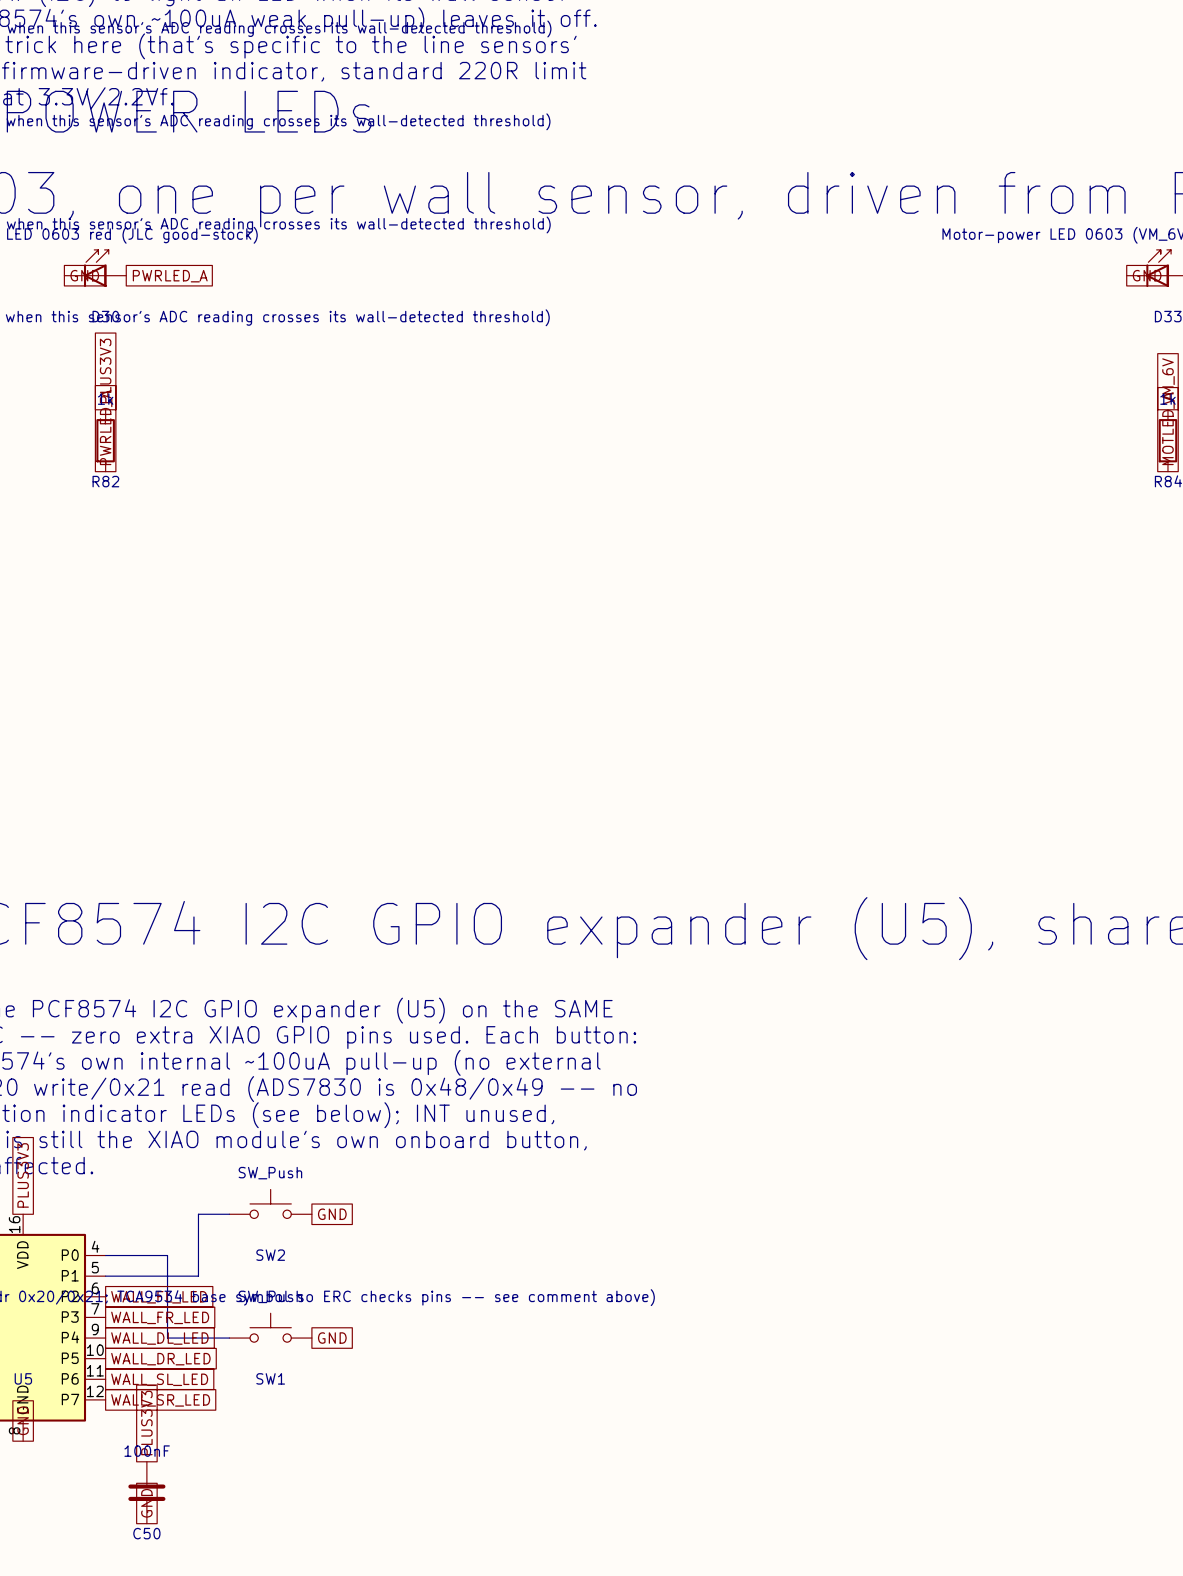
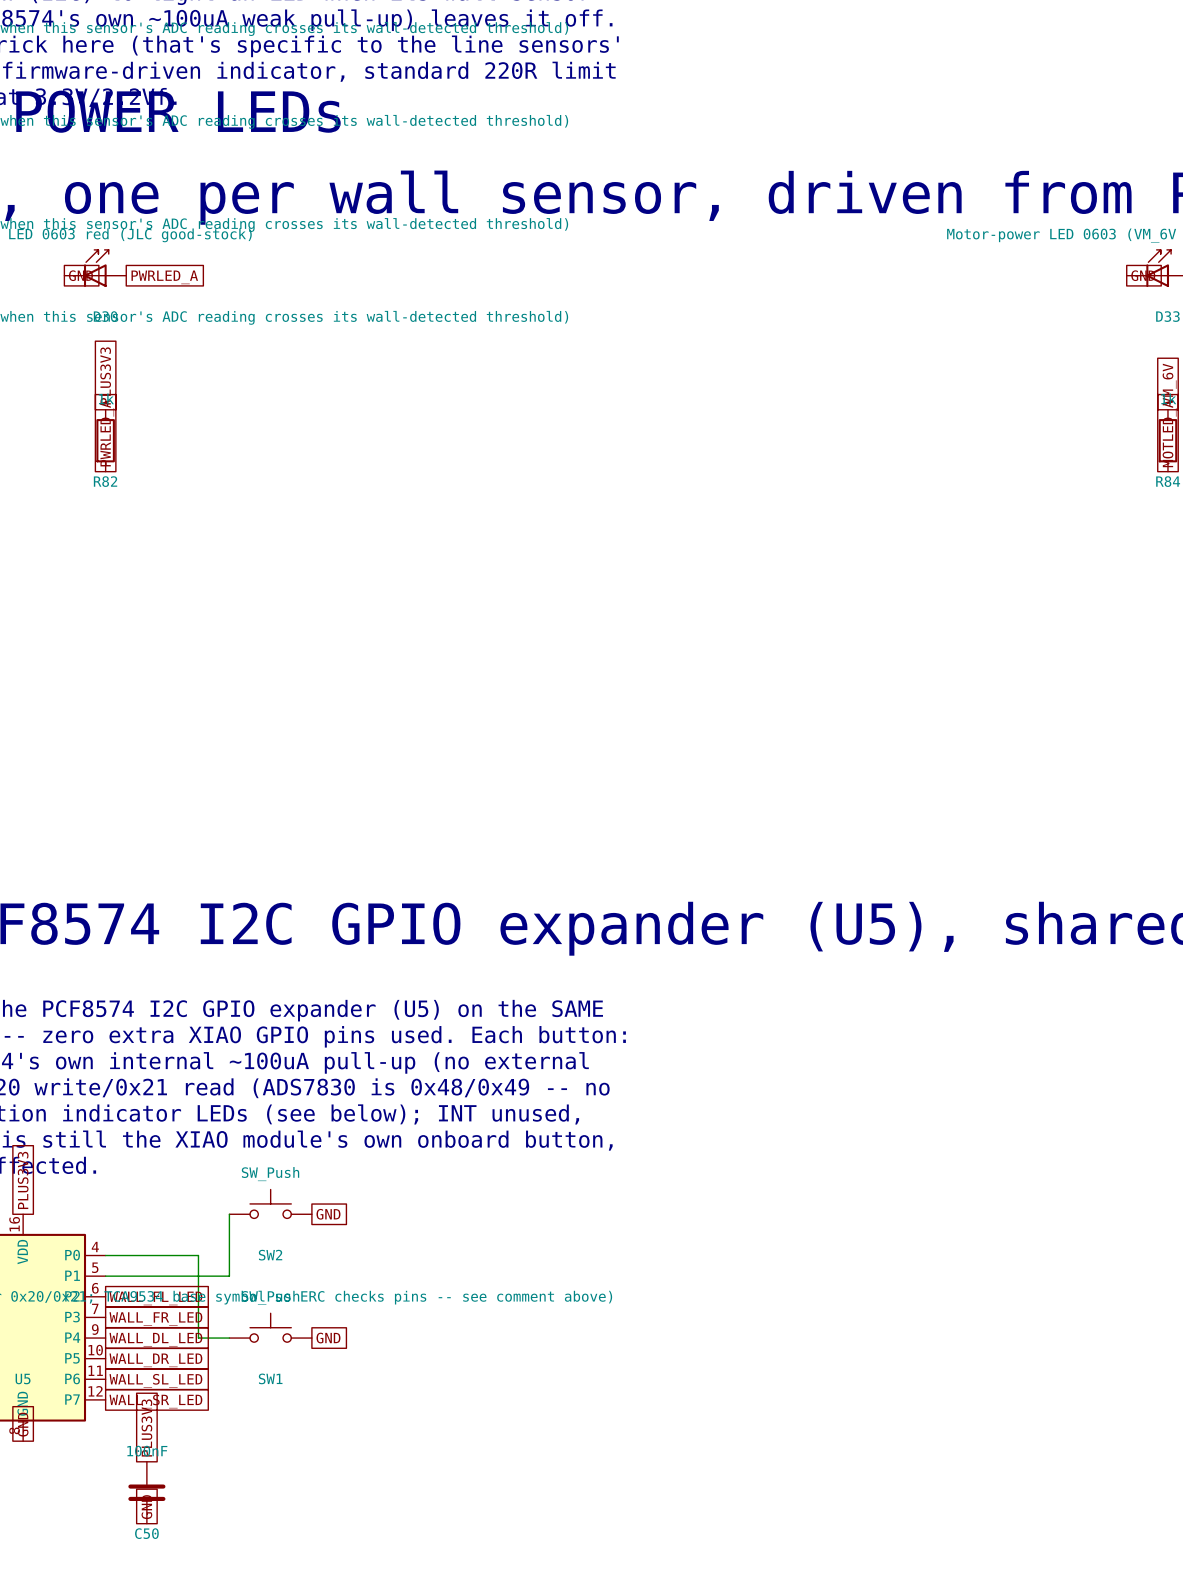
wire: (229, 1214) (198, 1214) (198, 1255) -> (167, 1255) (198, 1255)
wire: (167, 1255) (167, 1338) (198, 1338) -> (229, 1214) (229, 1276) (198, 1276) (198, 1338)

